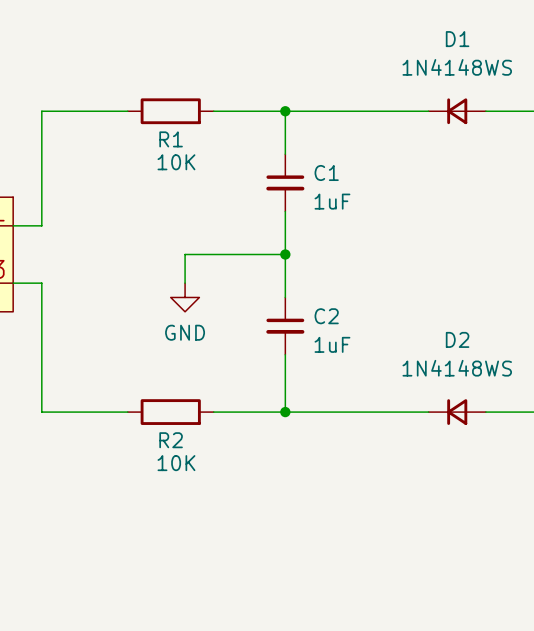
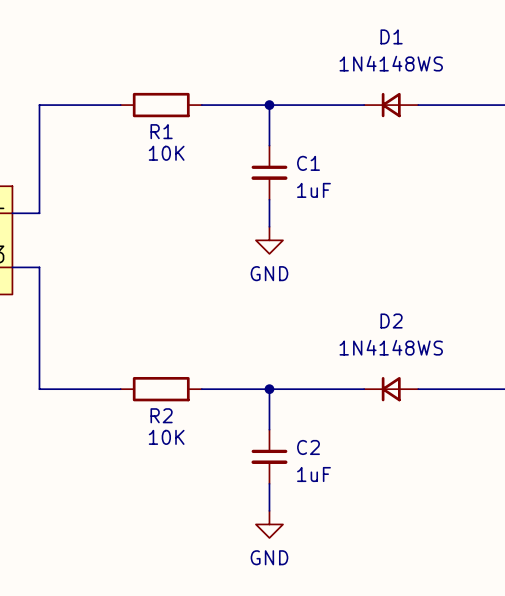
D1 position: (457, 111) -> (391, 105)
wire: (285, 240) (285, 297) -> none
wire: (285, 254) (185, 254) (185, 283) -> none
junction: (285, 254) -> none
power symbol position: GND (185, 297) -> GND (269, 240)
C2 position: (285, 326) -> (269, 456)
wire: (285, 354) (285, 412) -> (269, 429) (269, 389)
D2 position: (457, 412) -> (391, 389)
wire: none -> (269, 483) (269, 510)
power symbol: none -> GND (269, 524)

